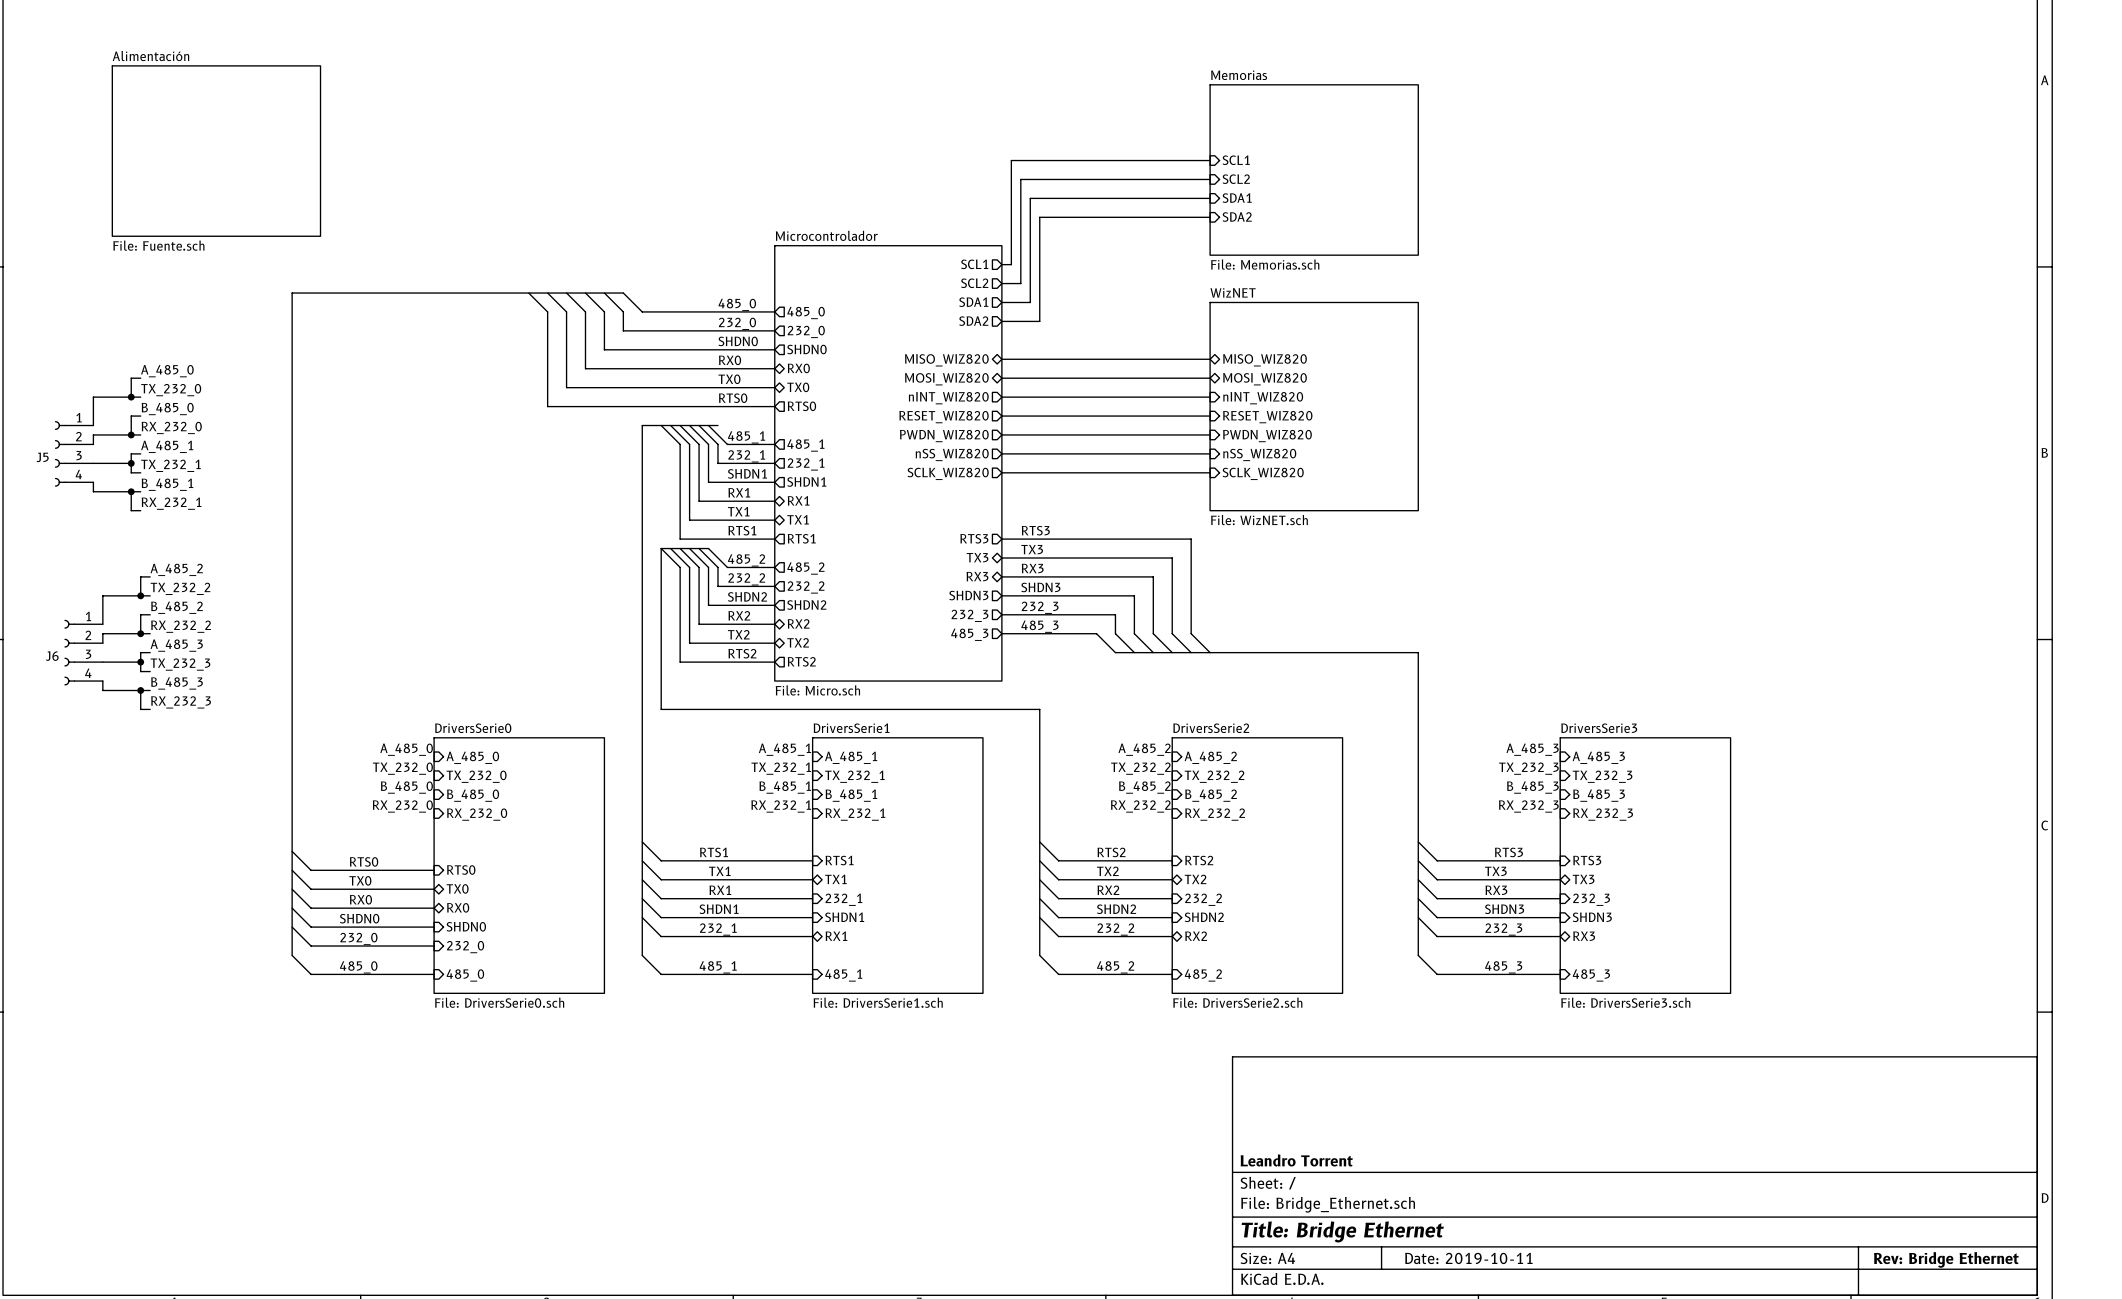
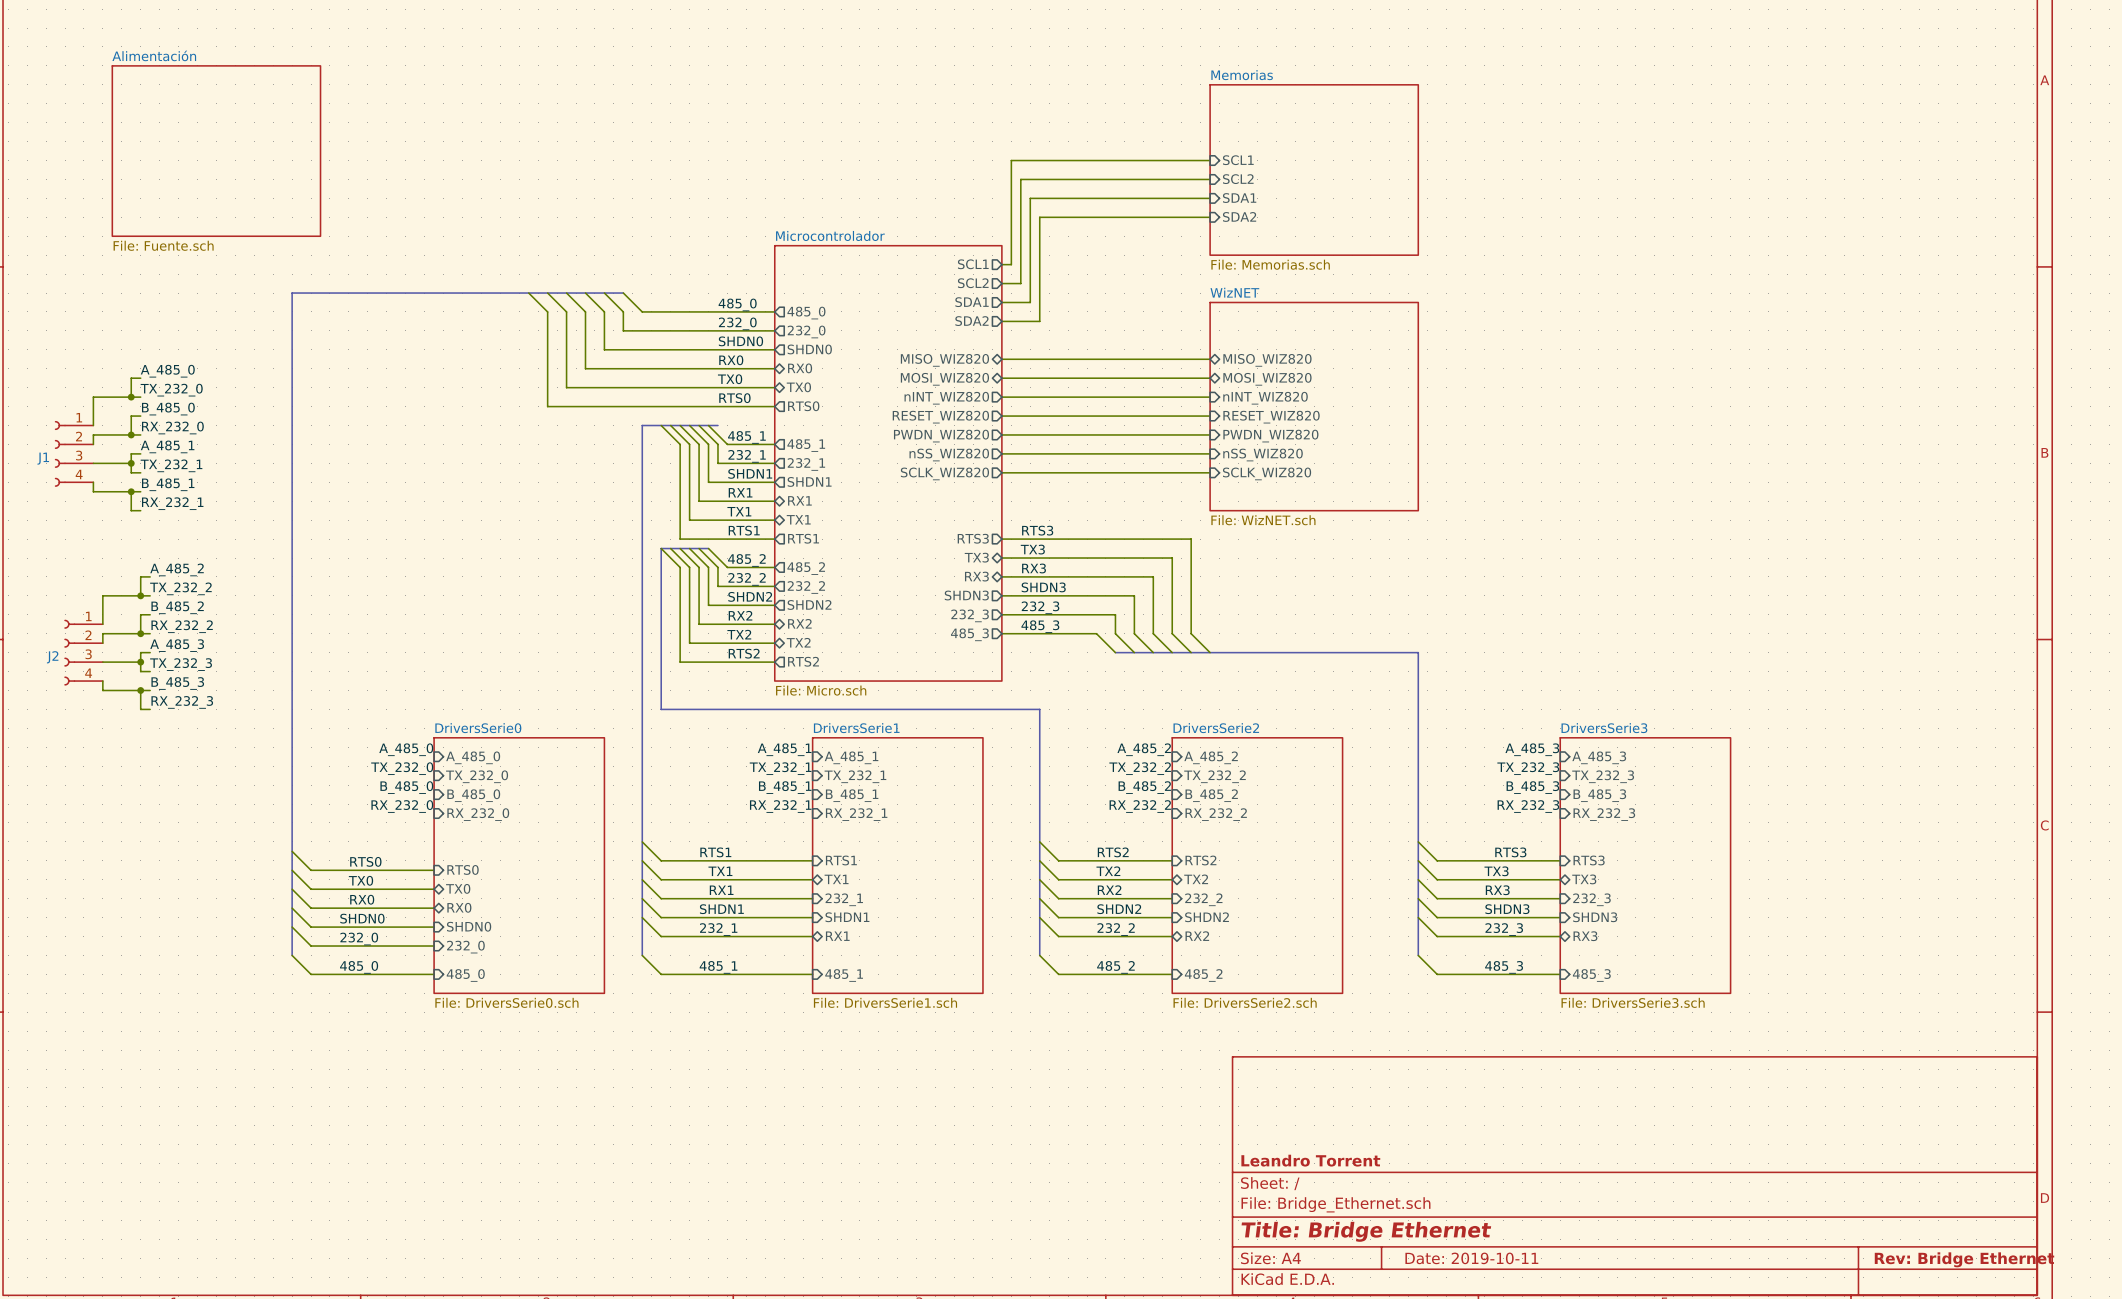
J5 name: J5 (42, 457) -> J1 (43, 458)
J6 name: J6 (52, 656) -> J2 (52, 657)

